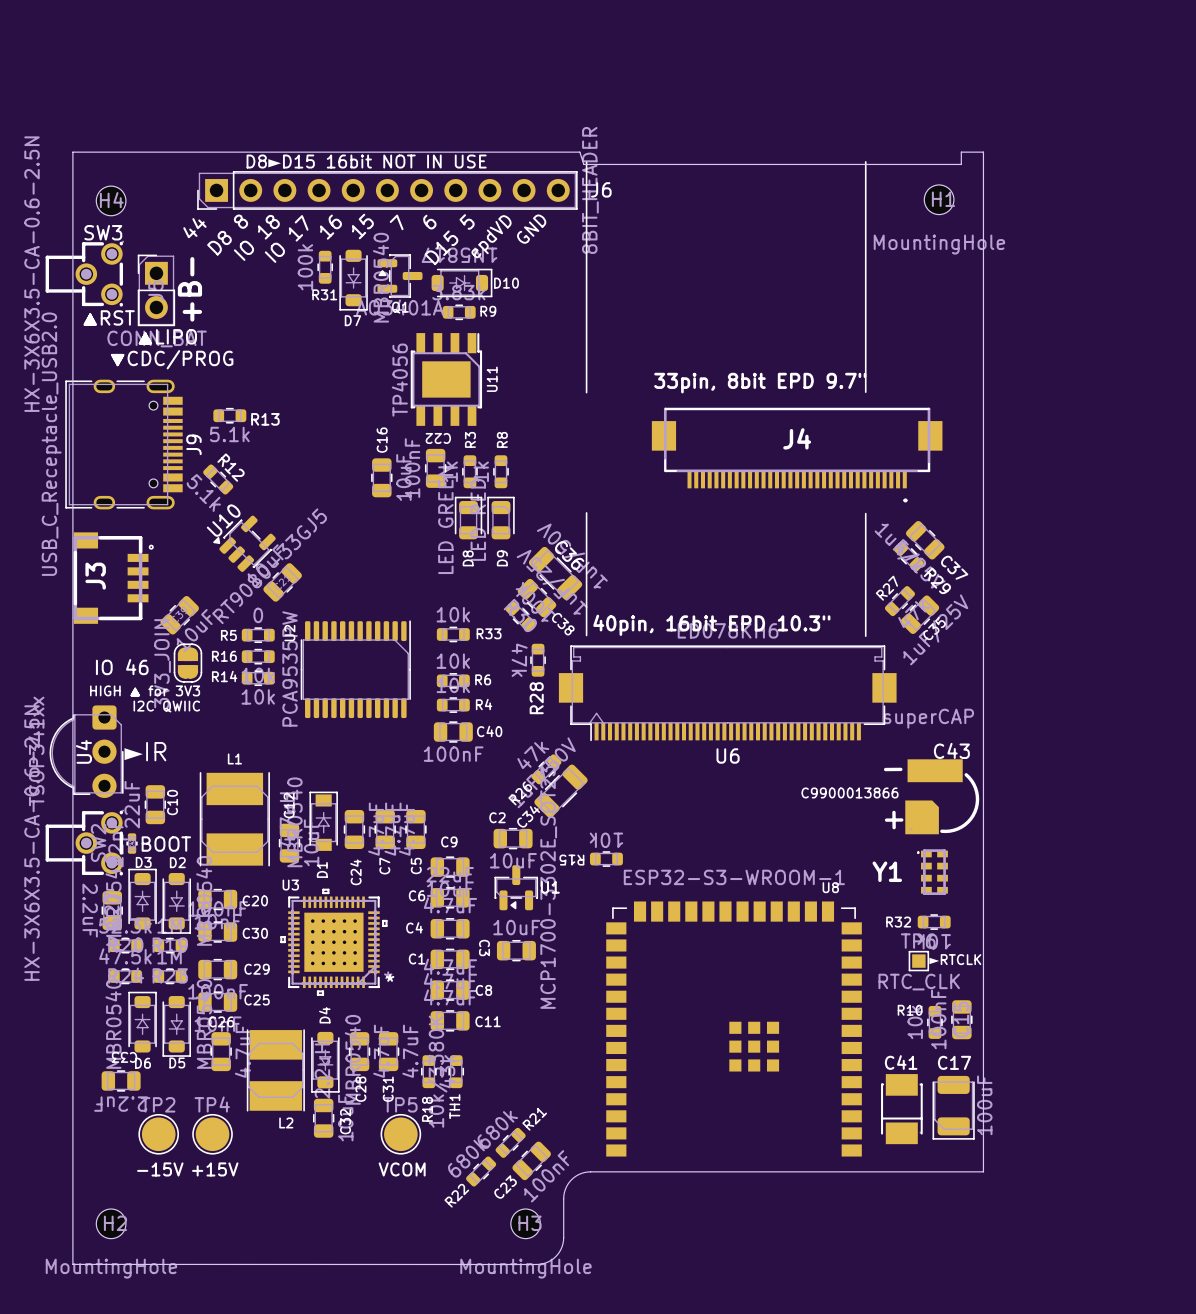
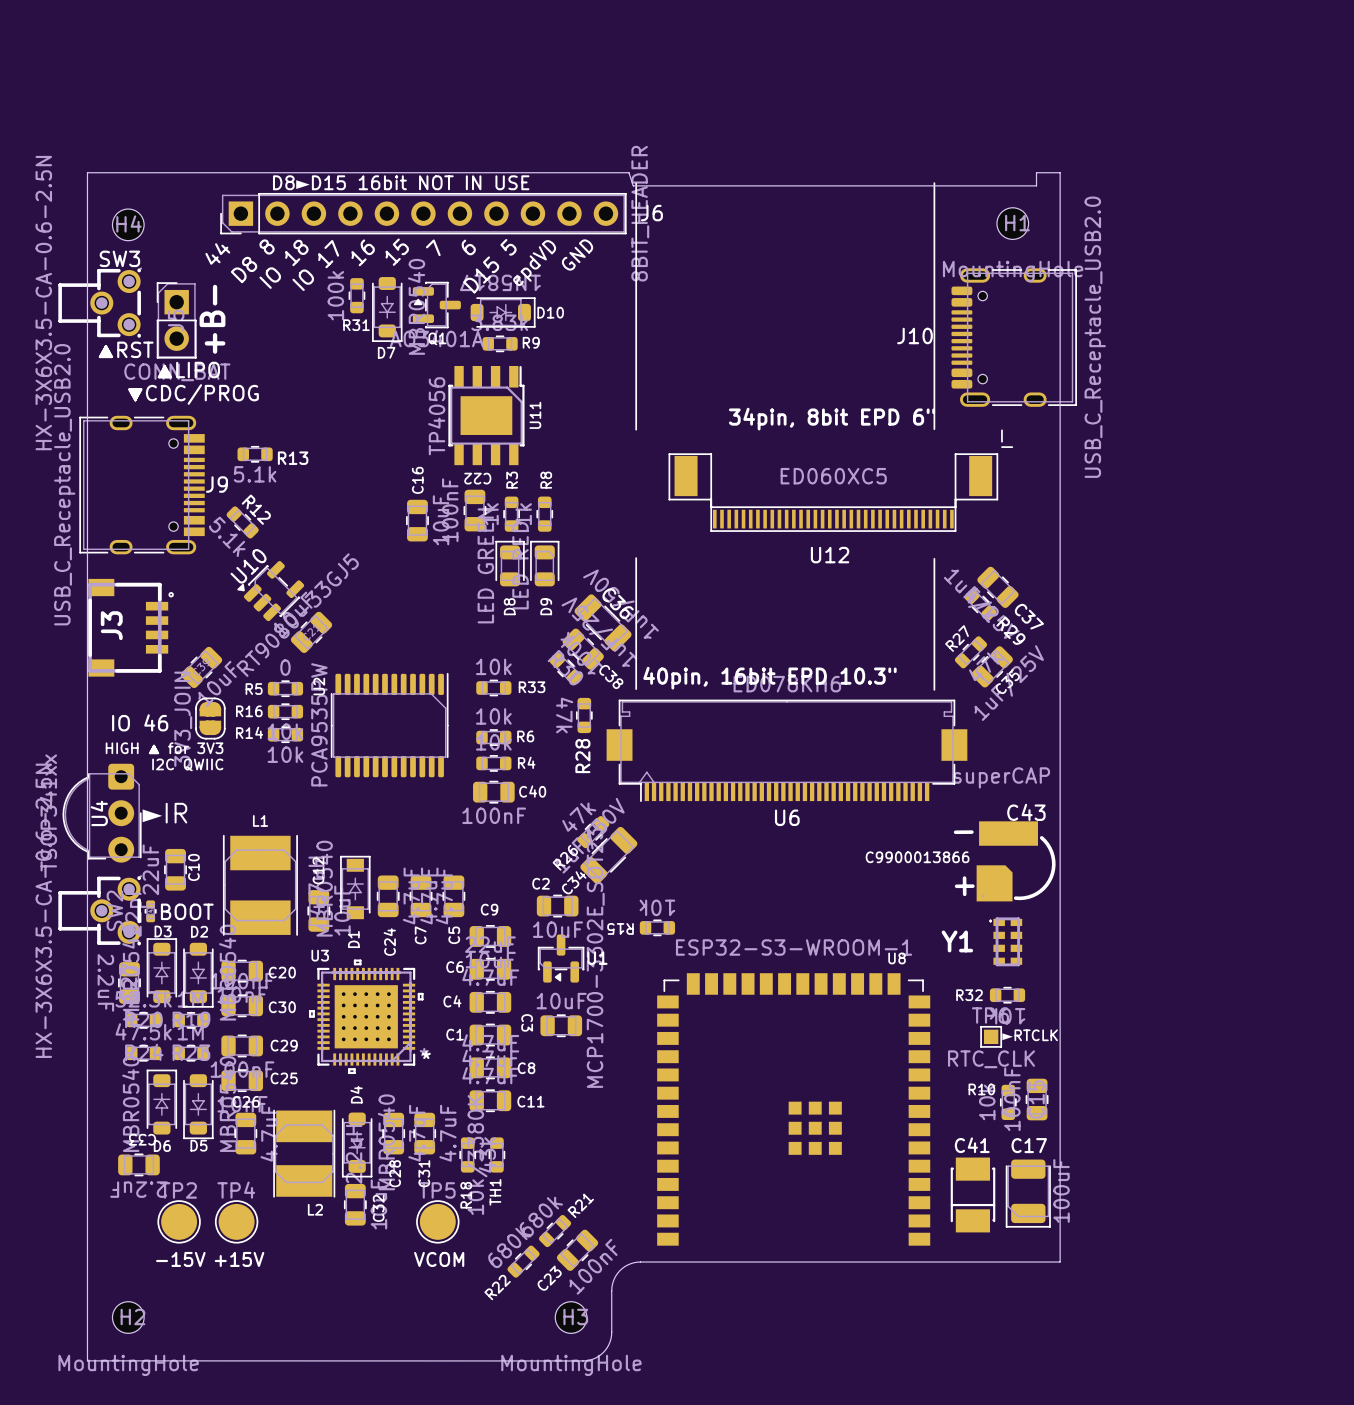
J10: none -> USB_C_Receptacle_USB2.0 (1014, 337)
text: 33pin, 8bit EPD 9.7" (760, 383) -> 34pin, 8bit EPD 6" (831, 419)
line: none -> (1001, 430) (1001, 441)
line: none -> (1001, 447) (1012, 447)
J9 name rotation: 0° (193, 444) -> 90° clockwise (216, 484)
U12: none -> ED060XC5 (833, 492)
J4: (797, 455) -> none

